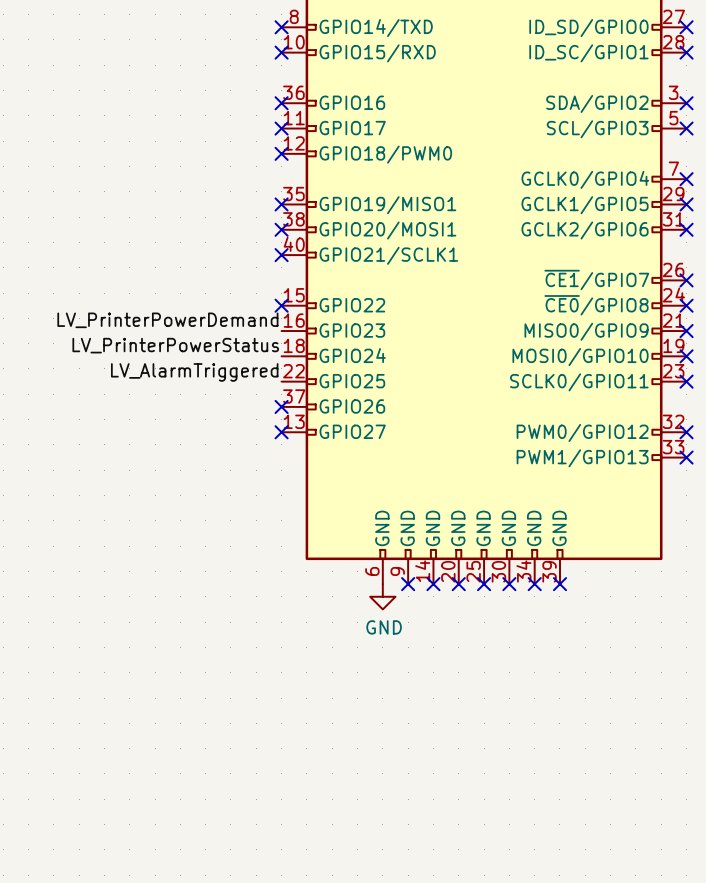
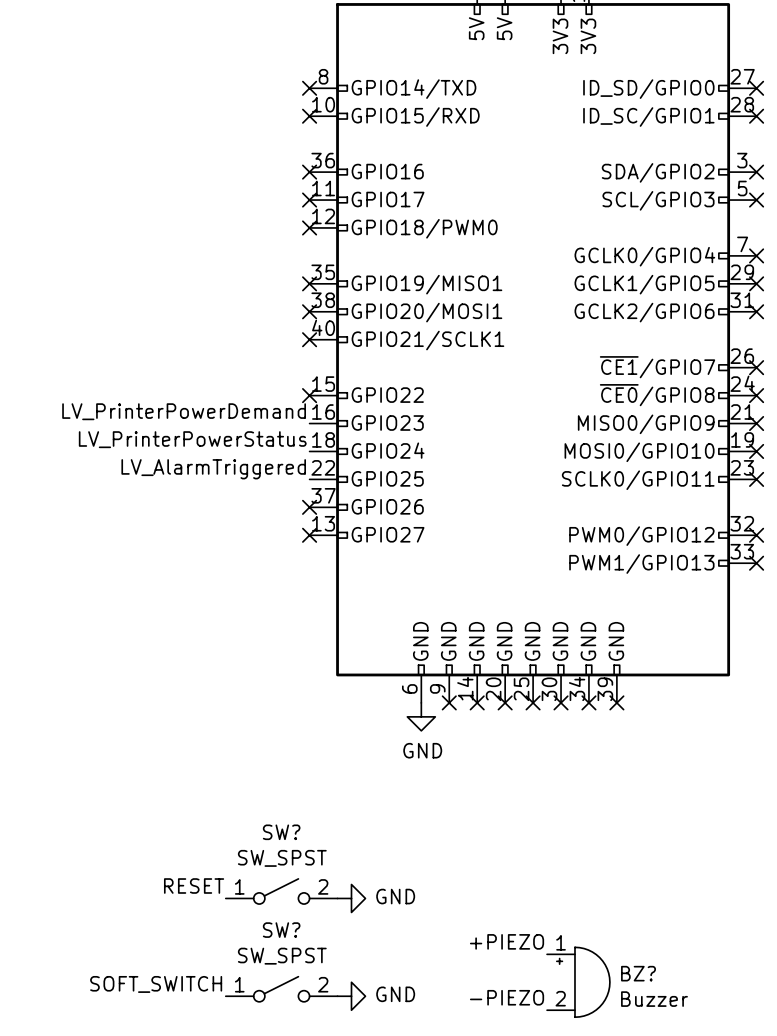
label: none -> RESET (194, 886)
SW?: none -> SW_SPST (281, 891)
power symbol: none -> GND (351, 898)
label: none -> +PIEZO (507, 941)
BZ?: none -> Buzzer (578, 982)
label: none -> SOFT_SWITCH (156, 984)
SW?: none -> SW_SPST (281, 989)
power symbol: none -> GND (351, 996)
label: none -> -PIEZO (507, 997)

